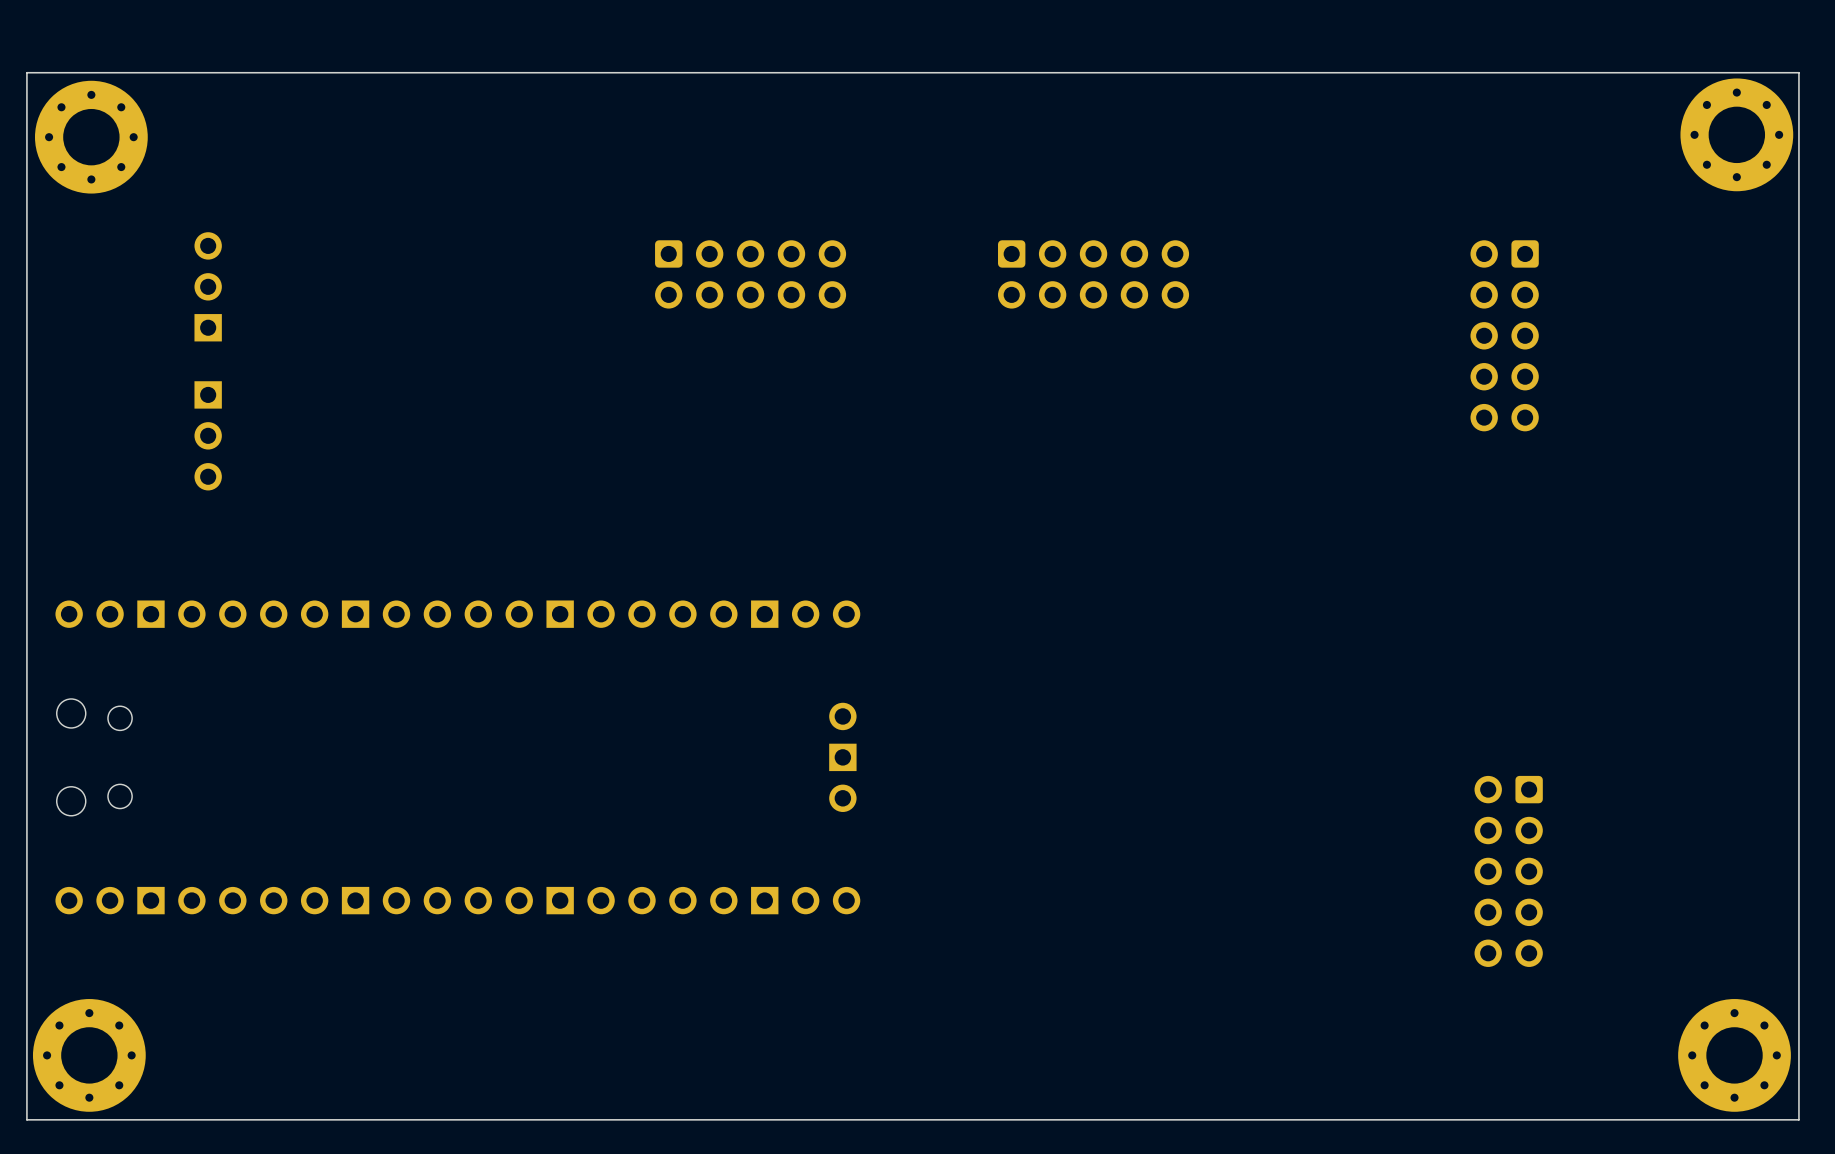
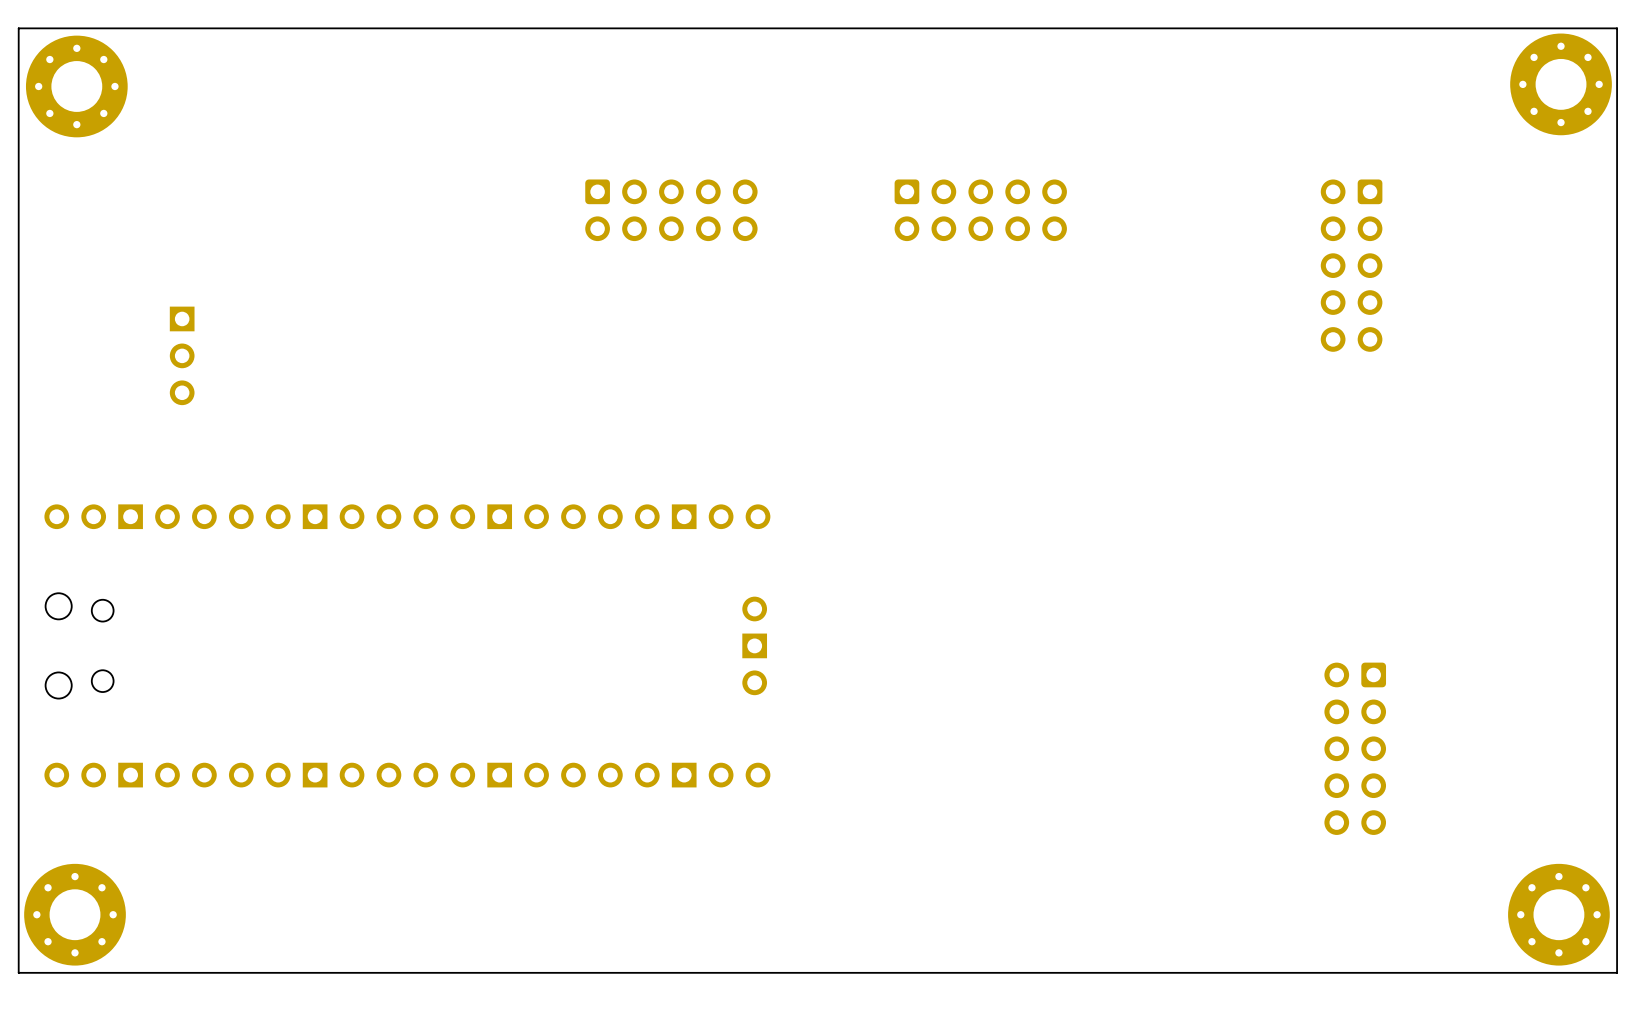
part: (208, 286) -> none

